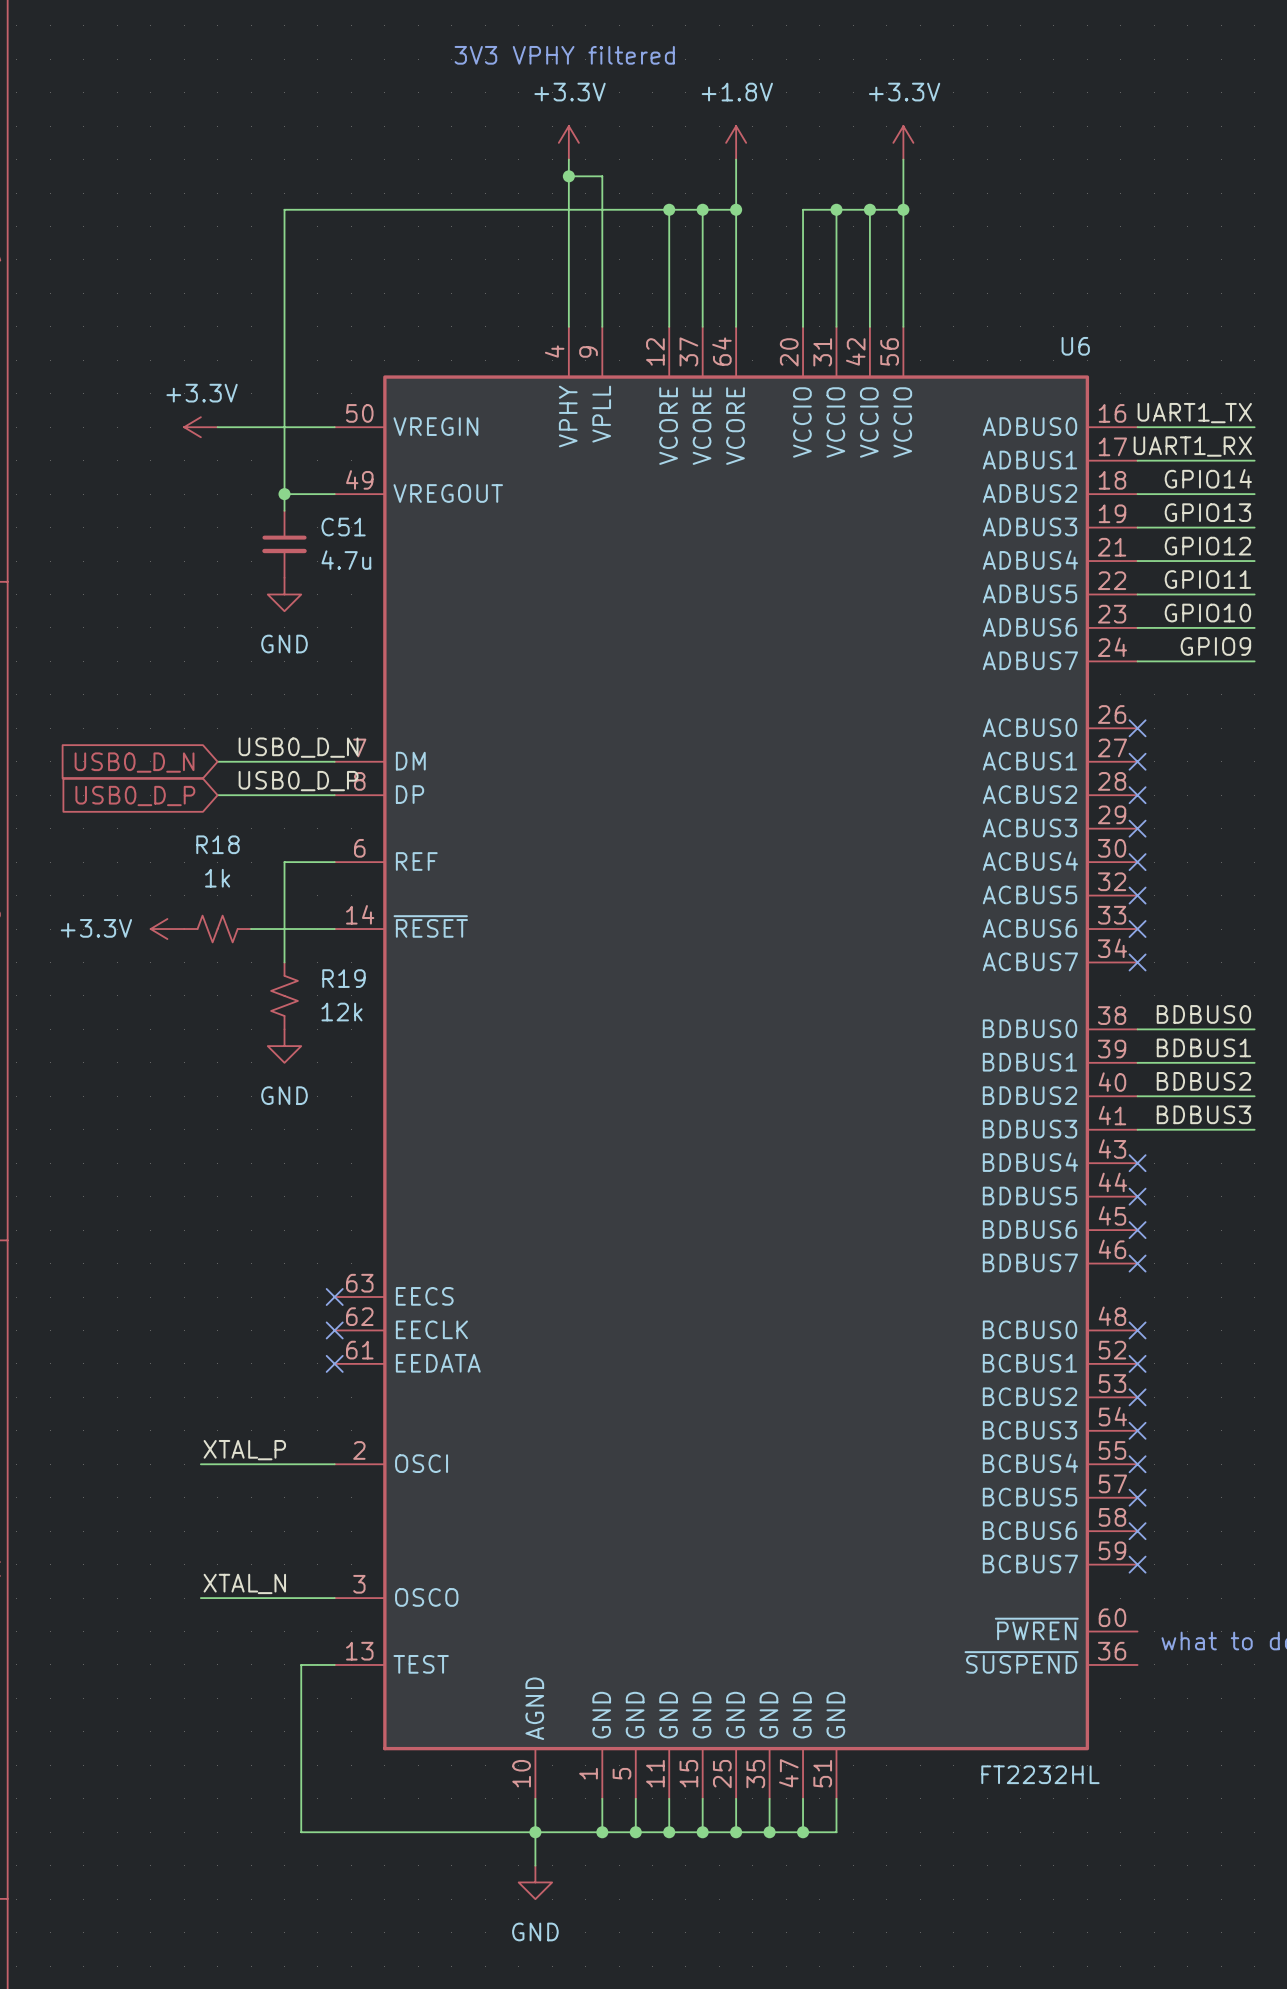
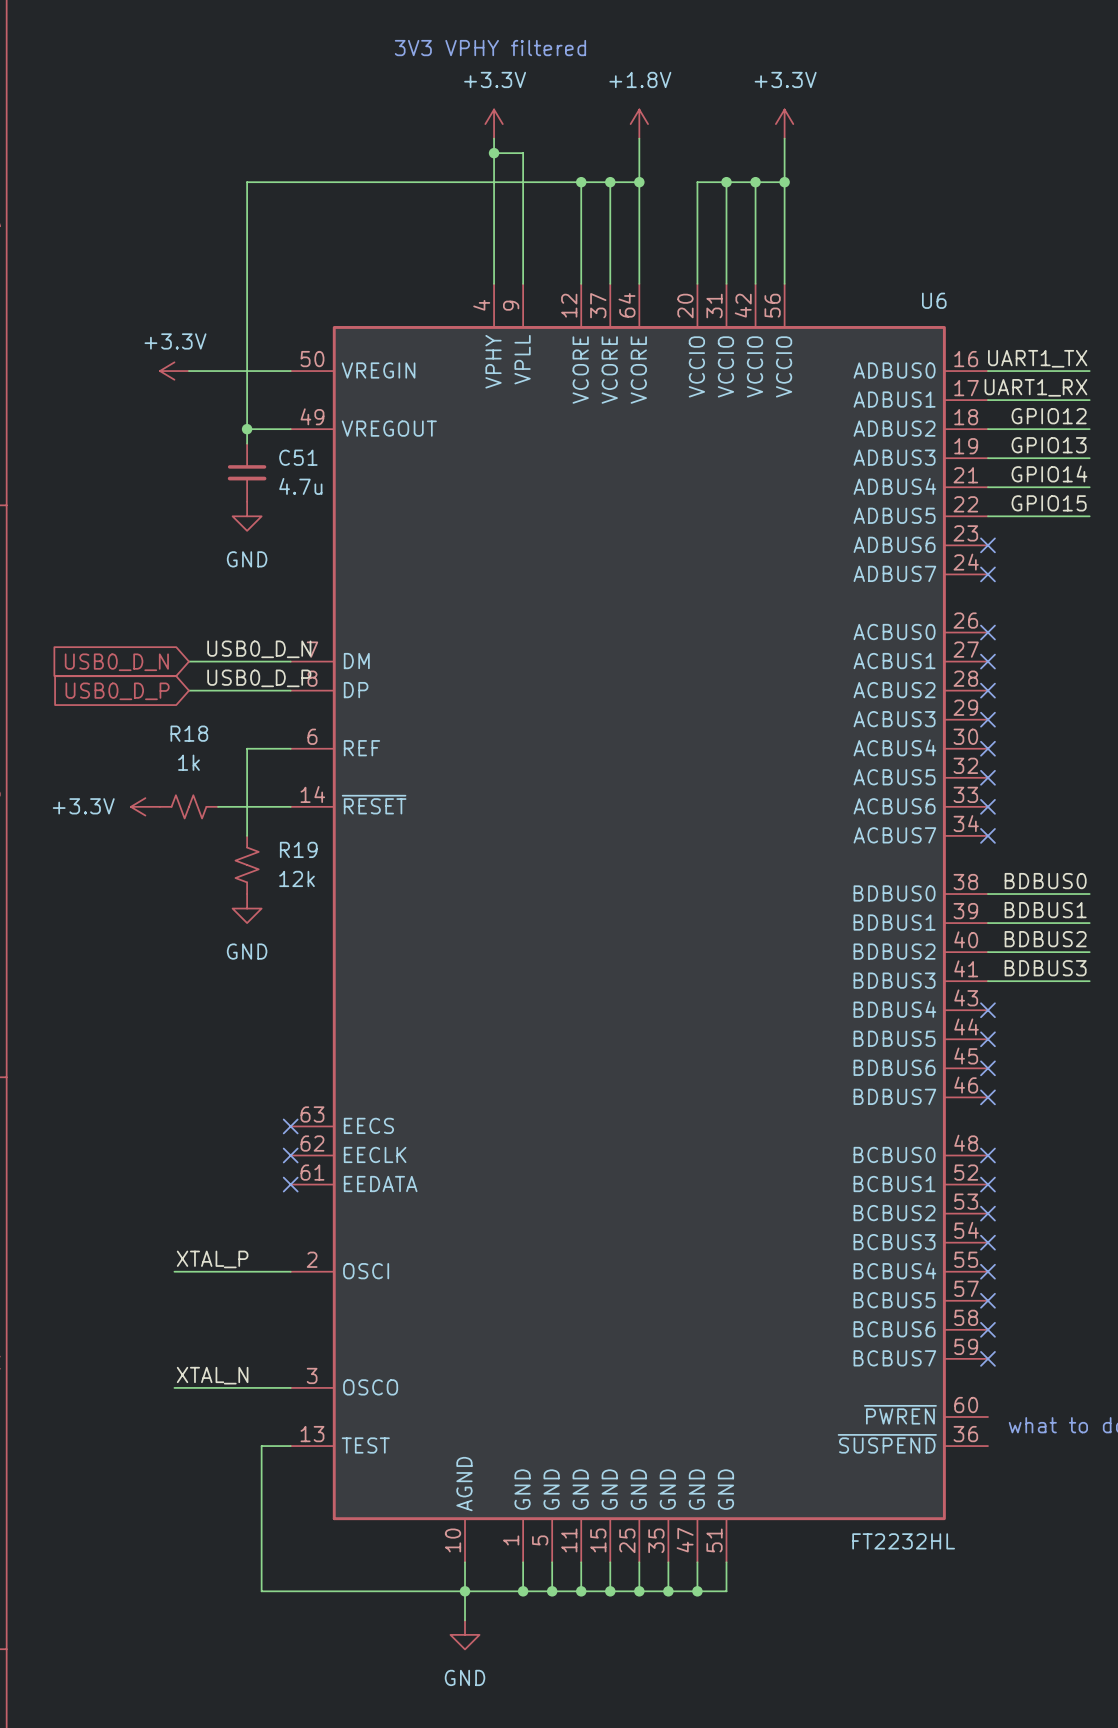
label: GPIO14 (1208, 478) -> GPIO12 (1049, 416)
label: GPIO12 (1207, 546) -> GPIO14 (1049, 473)
label: GPIO11 (1207, 579) -> GPIO15 (1049, 503)
label: GPIO10 (1207, 613) -> none
wire: (1137, 627) (1254, 627) -> none
no-connect mark: none -> (987, 545)
label: GPIO9 (1215, 646) -> none
wire: (1137, 661) (1254, 661) -> none
no-connect mark: none -> (987, 574)

